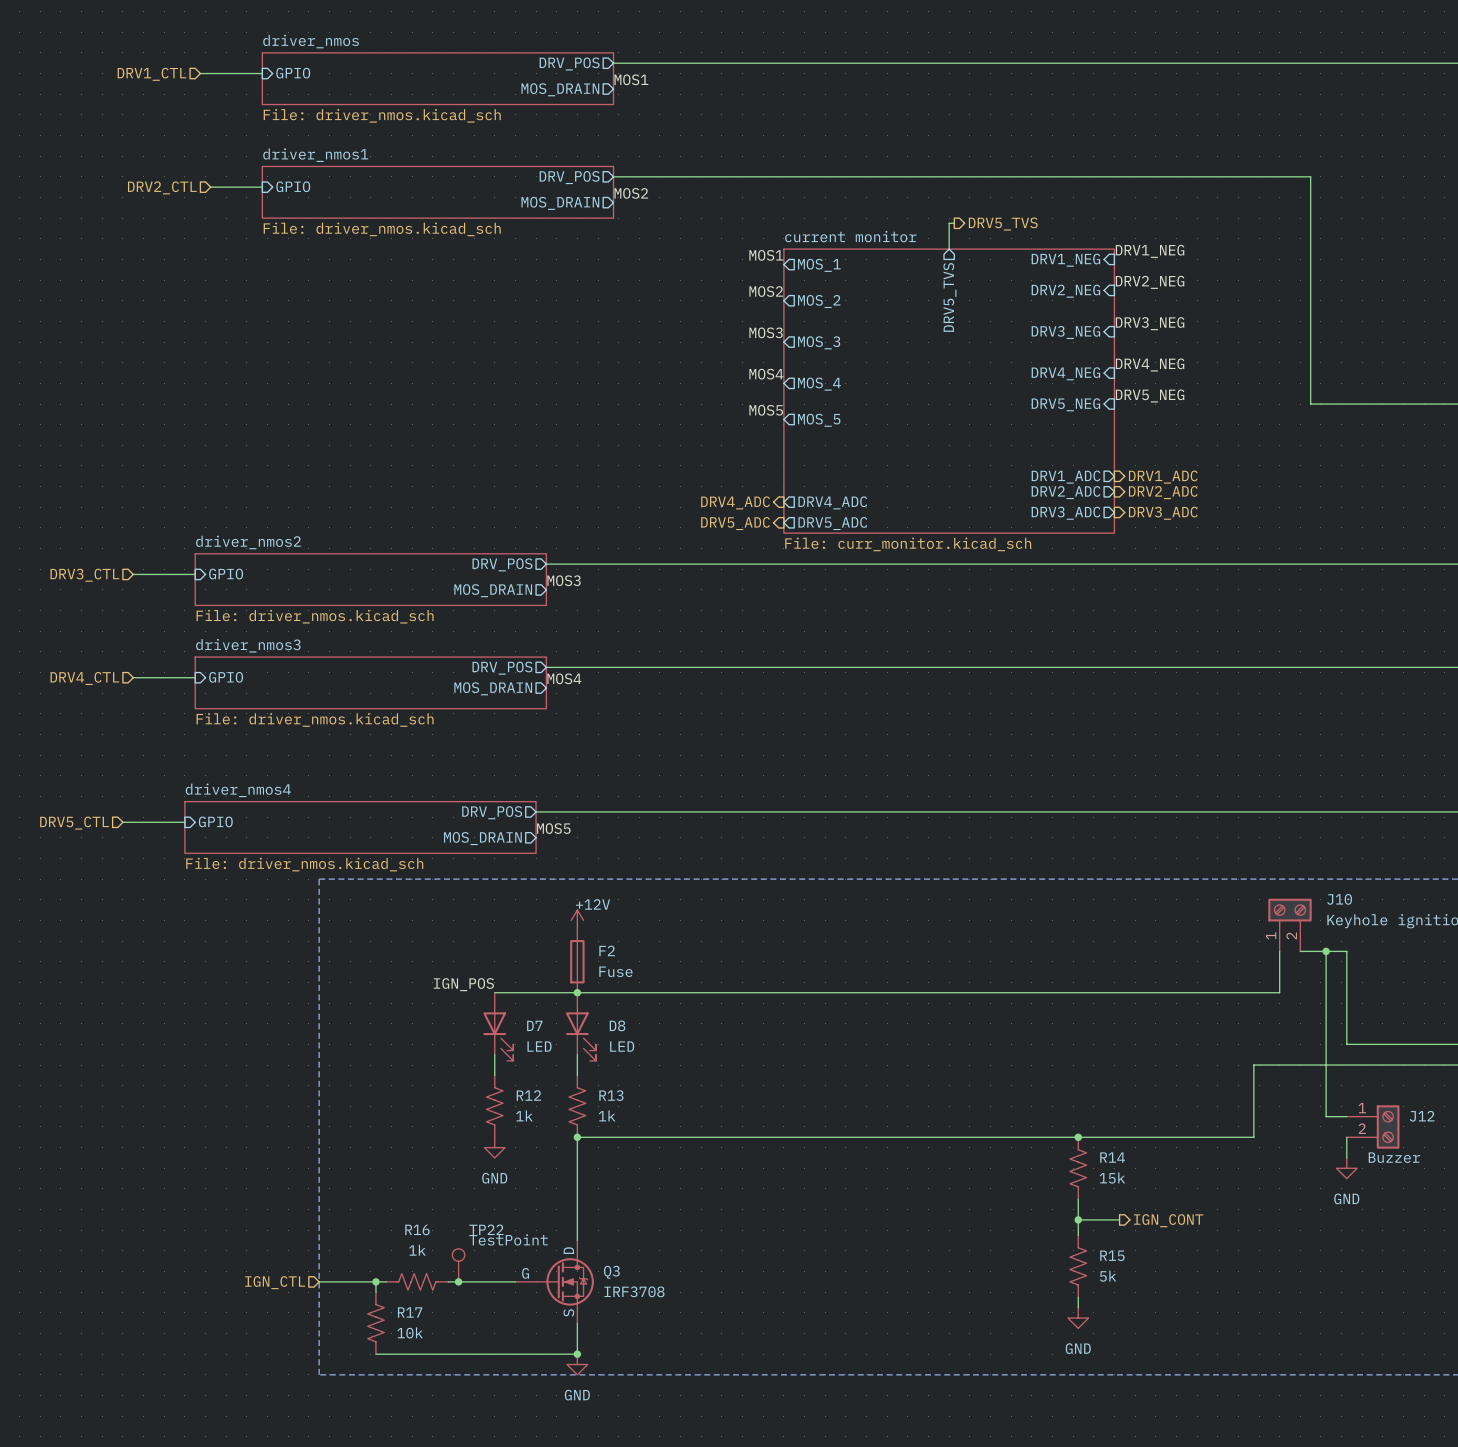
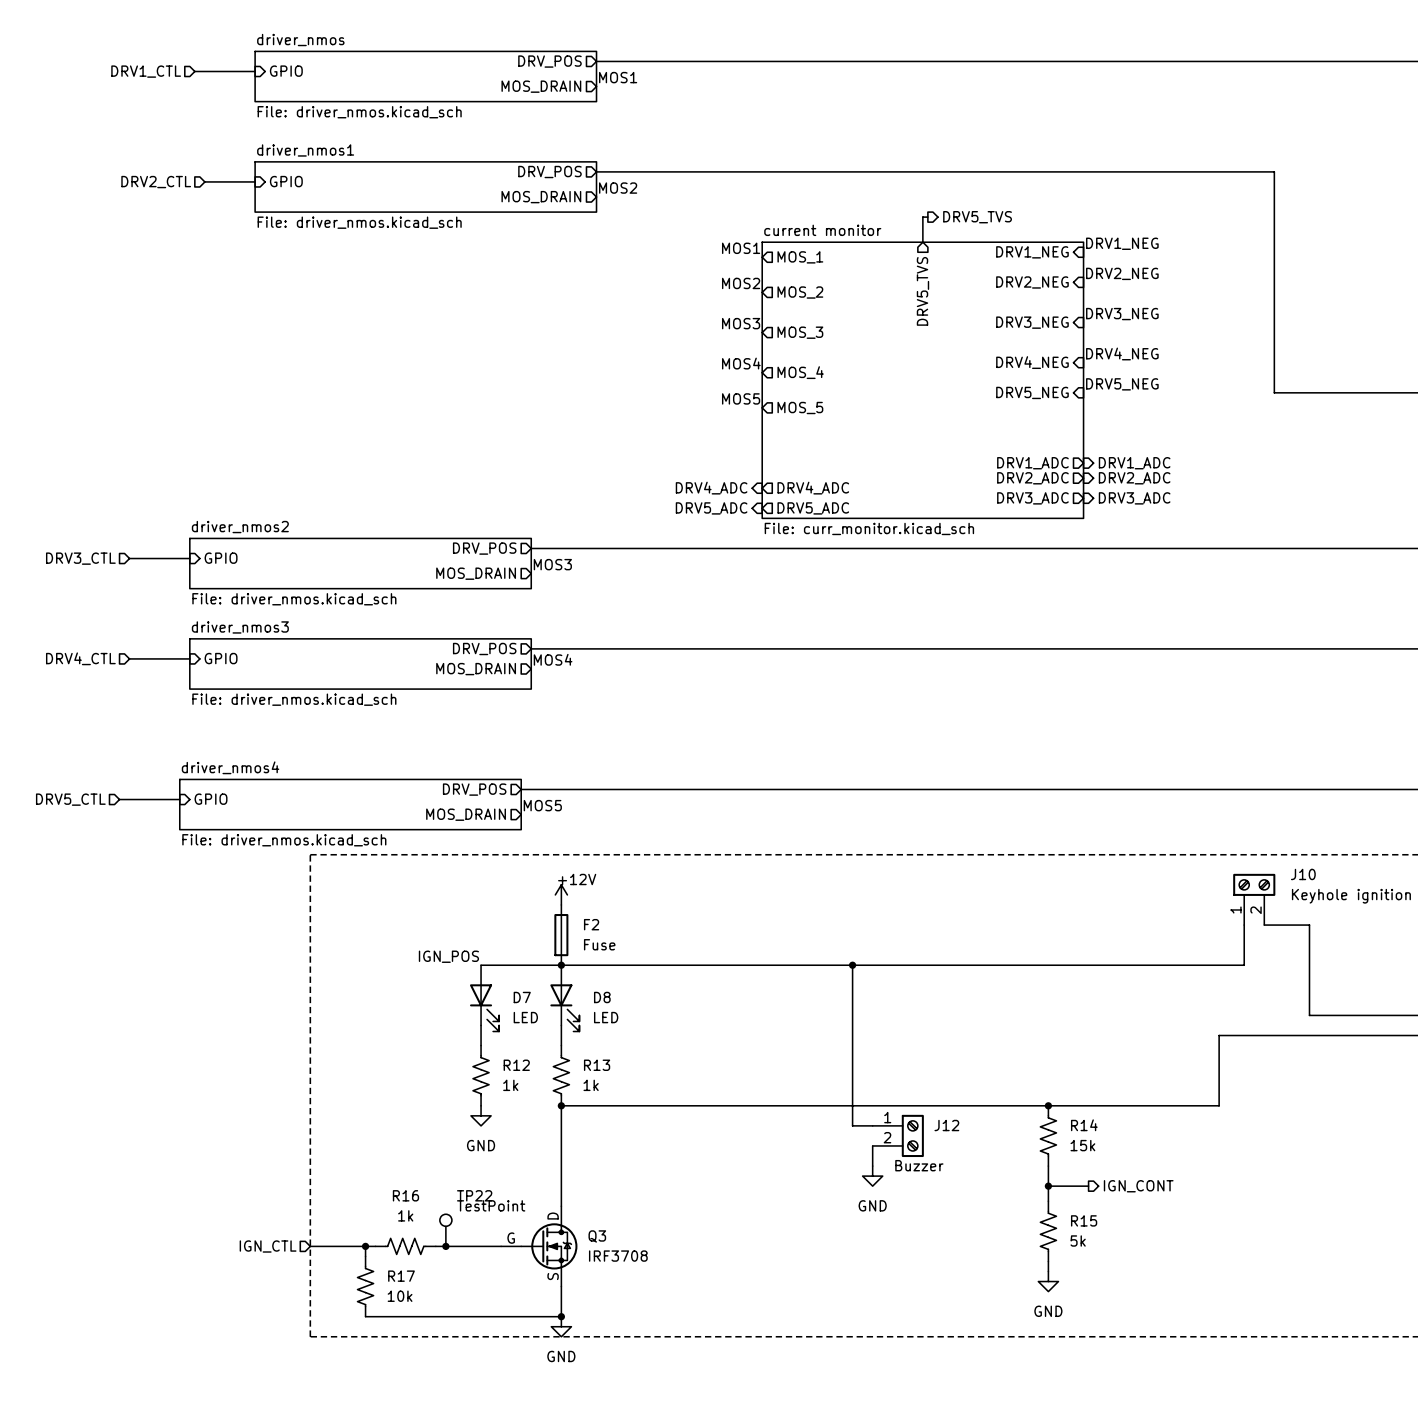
wire: (1326, 951) (1326, 1116) (1346, 1116) -> none
junction: (1326, 951) -> none
wire: none -> (852, 965) (852, 1125) (872, 1125)
junction: none -> (852, 965)
J12 position: (1373, 1126) -> (898, 1135)
wire: (1346, 1137) (1346, 1157) -> none
power symbol: GND (1346, 1168) -> none
wire: none -> (872, 1145) (872, 1166)
power symbol: none -> GND (872, 1176)

